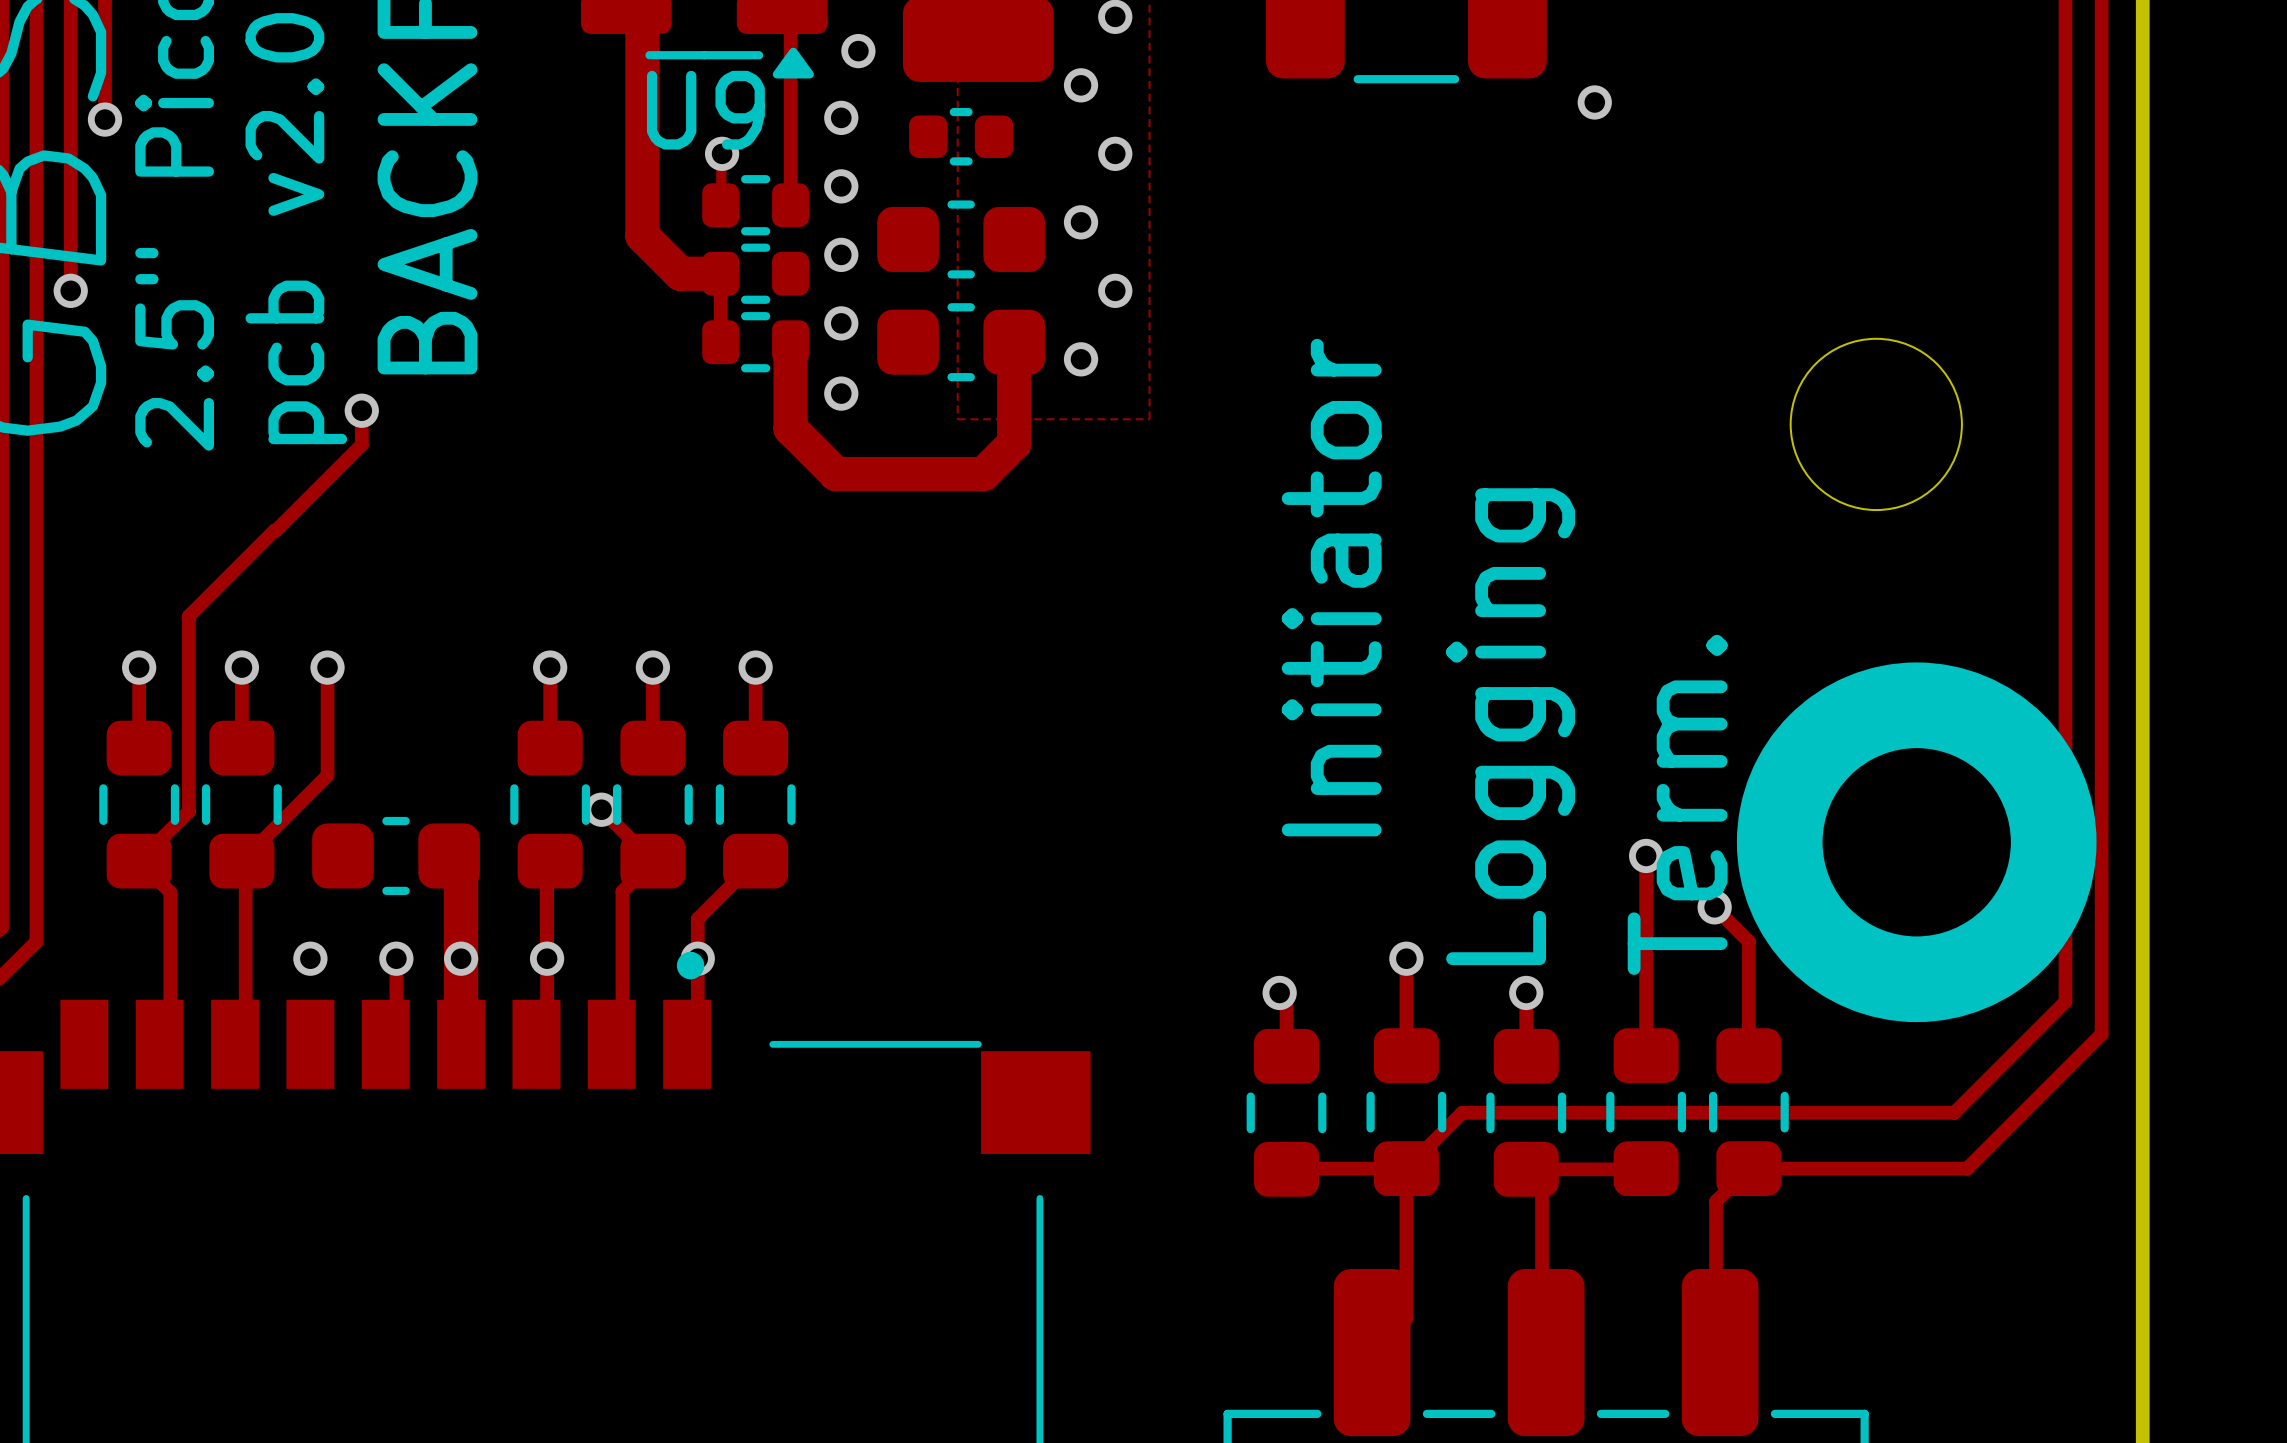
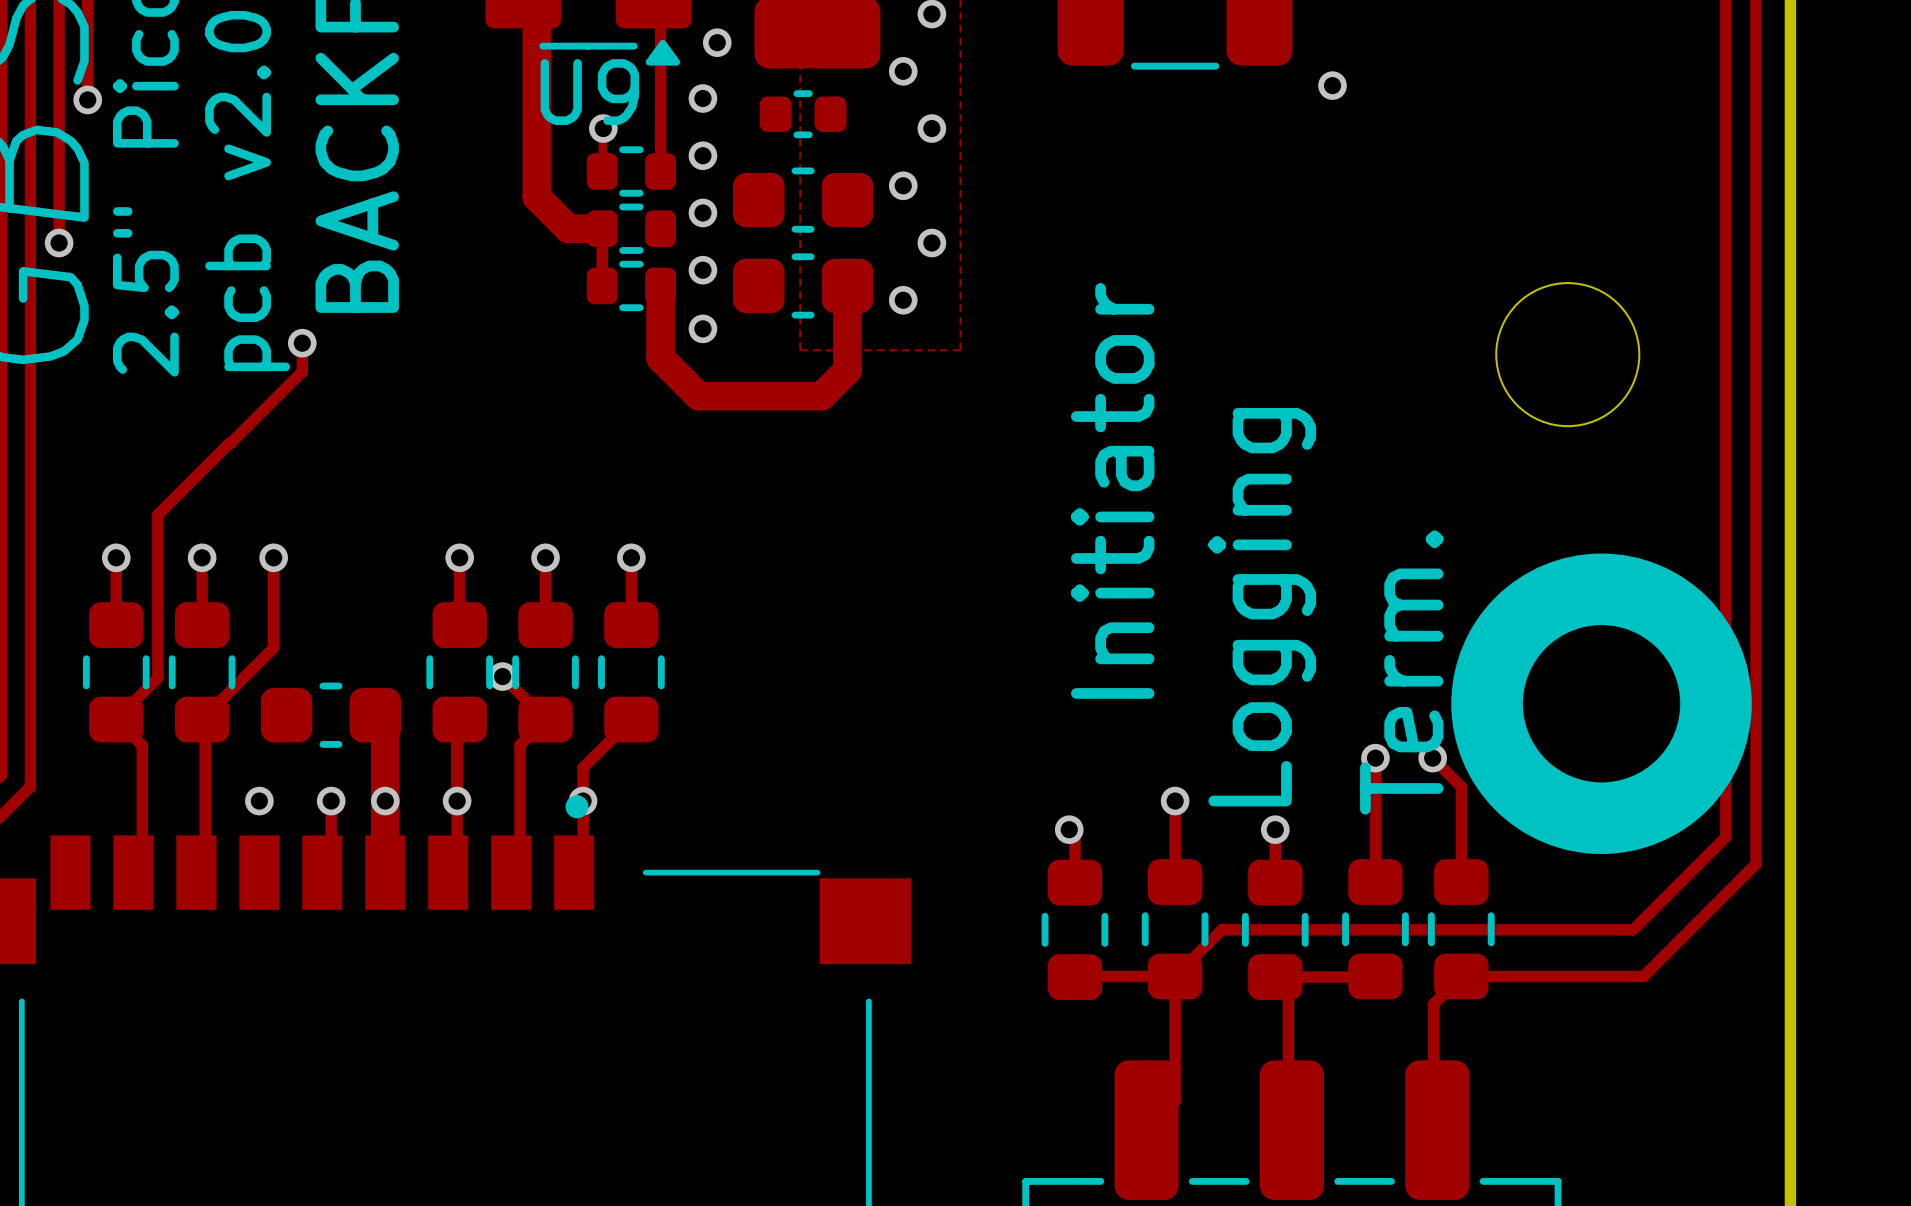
track: (1646, 855) (1646, 907) -> none
via position: (1646, 855) -> (1375, 758)

